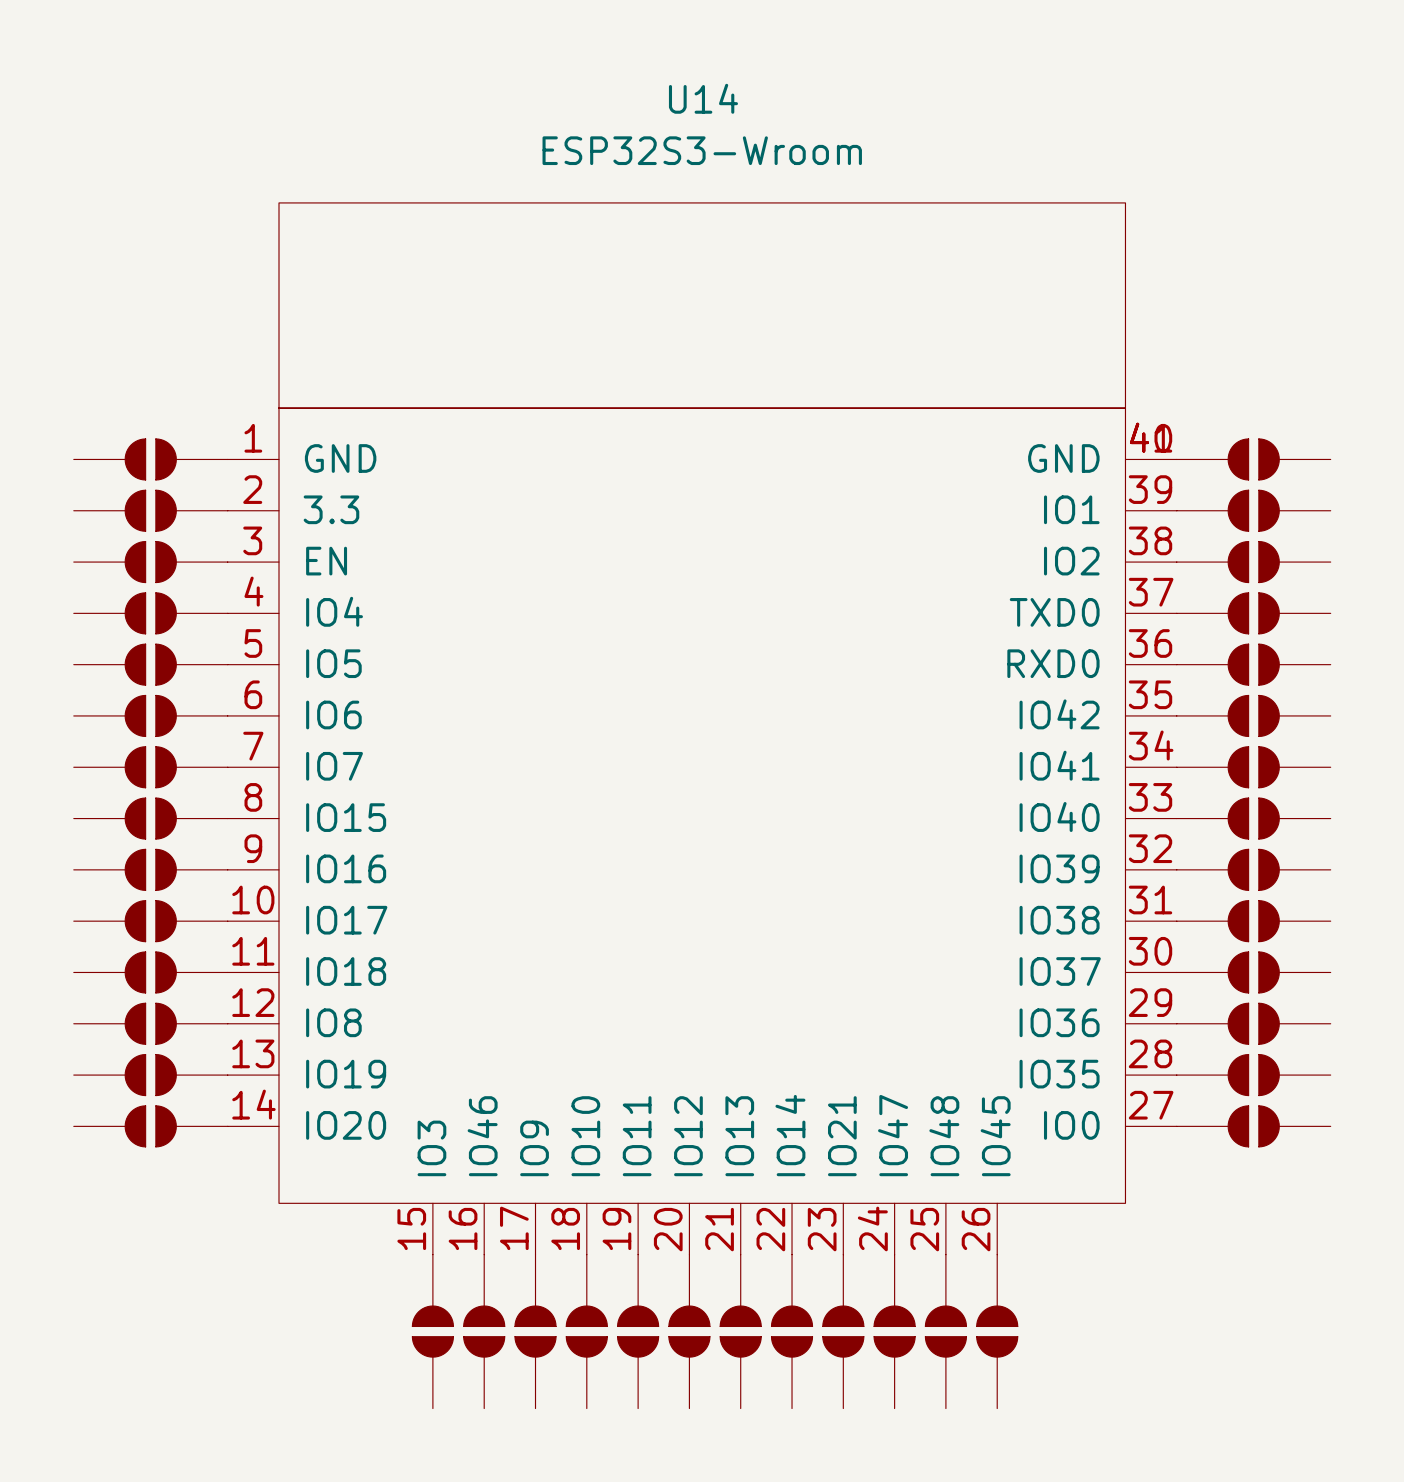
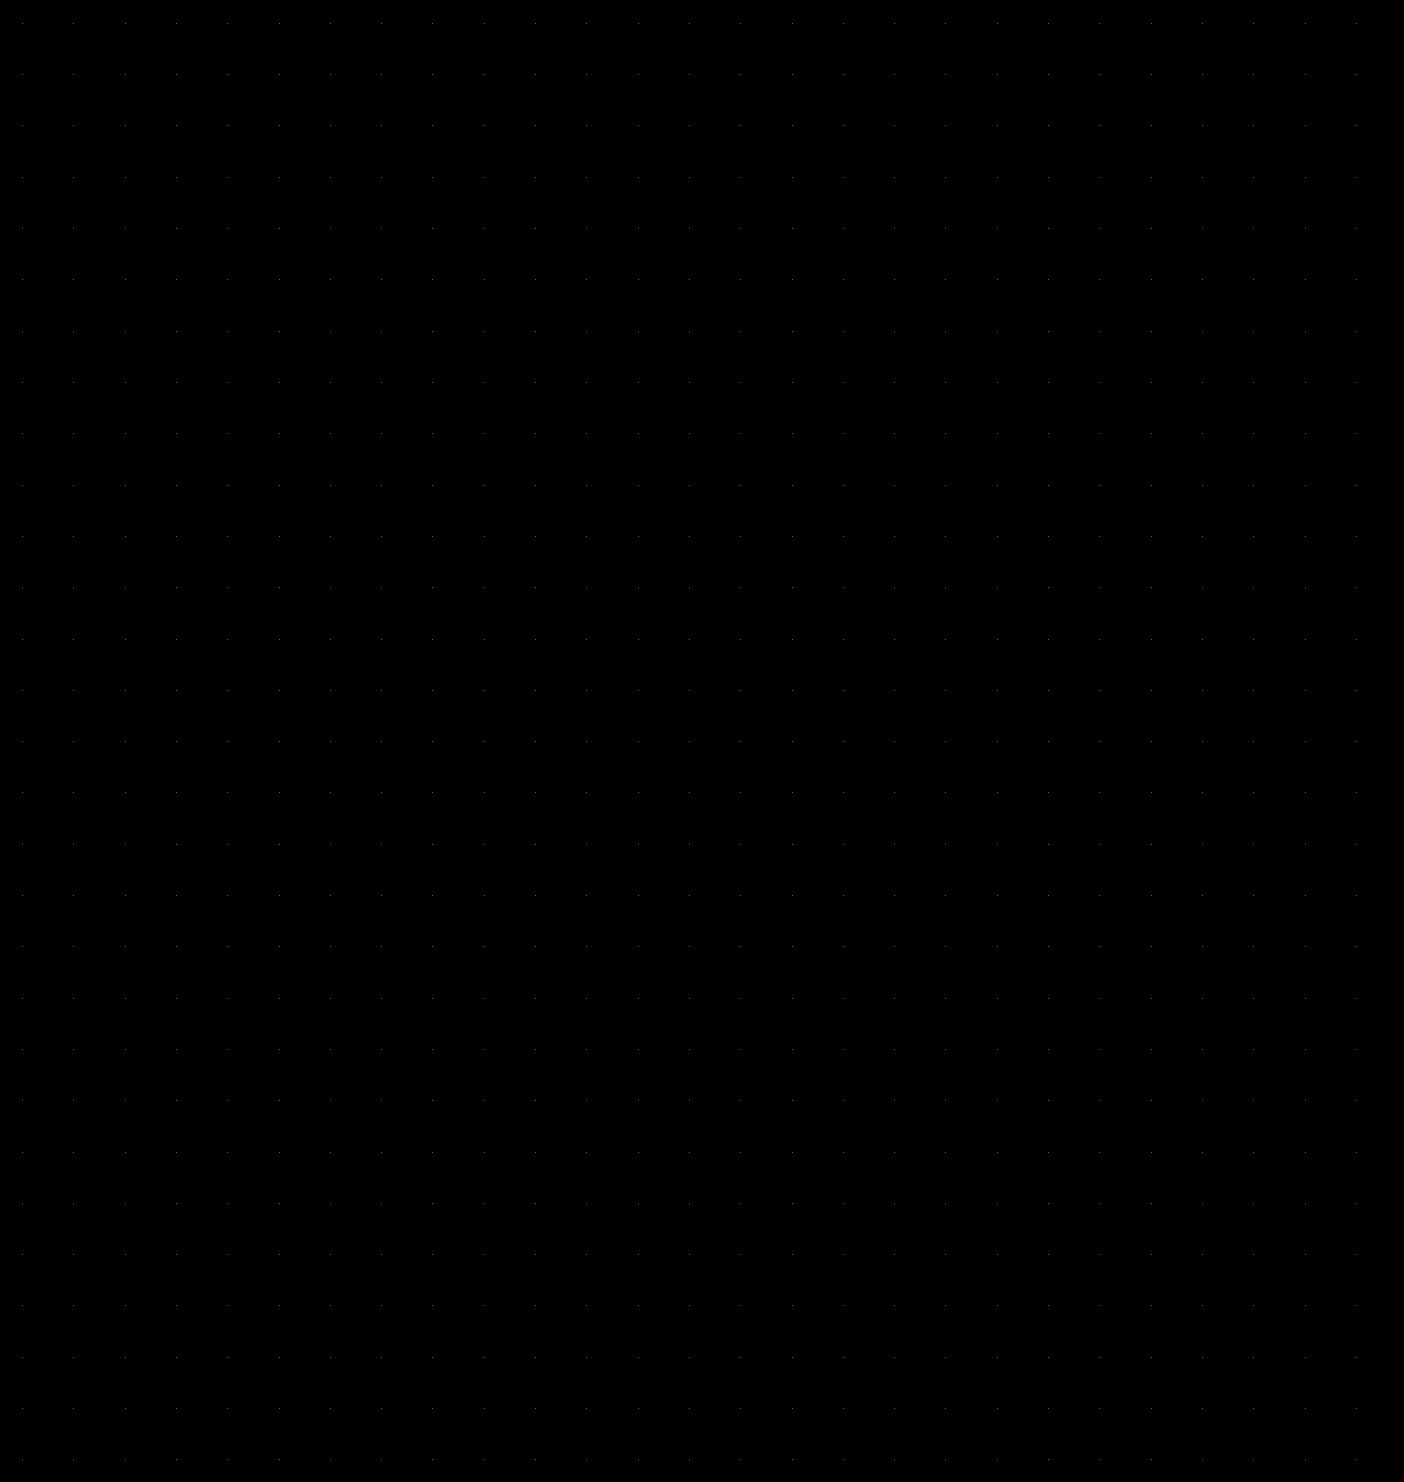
part: (150, 459) -> none
part: (1253, 459) -> none
part: (150, 510) -> none
part: (1253, 510) -> none
part: (150, 562) -> none
part: (1253, 562) -> none
part: (150, 613) -> none
part: (1253, 613) -> none
part: (150, 664) -> none
part: (1253, 664) -> none
part: (150, 715) -> none
part: (1253, 715) -> none
U14: ESP32S3-Wroom (702, 728) -> none
part: (150, 767) -> none
part: (1253, 767) -> none
part: (150, 818) -> none
part: (1253, 818) -> none
part: (150, 869) -> none
part: (1253, 869) -> none
part: (150, 921) -> none
part: (1253, 921) -> none
part: (150, 972) -> none
part: (1253, 972) -> none
part: (150, 1023) -> none
part: (1253, 1023) -> none
part: (150, 1075) -> none
part: (1253, 1075) -> none
part: (150, 1126) -> none
part: (1253, 1126) -> none
part: (432, 1331) -> none
part: (484, 1331) -> none
part: (535, 1331) -> none
part: (586, 1331) -> none
part: (638, 1331) -> none
part: (689, 1331) -> none
part: (740, 1331) -> none
part: (792, 1331) -> none
part: (843, 1331) -> none
part: (894, 1331) -> none
part: (945, 1331) -> none
part: (997, 1331) -> none

